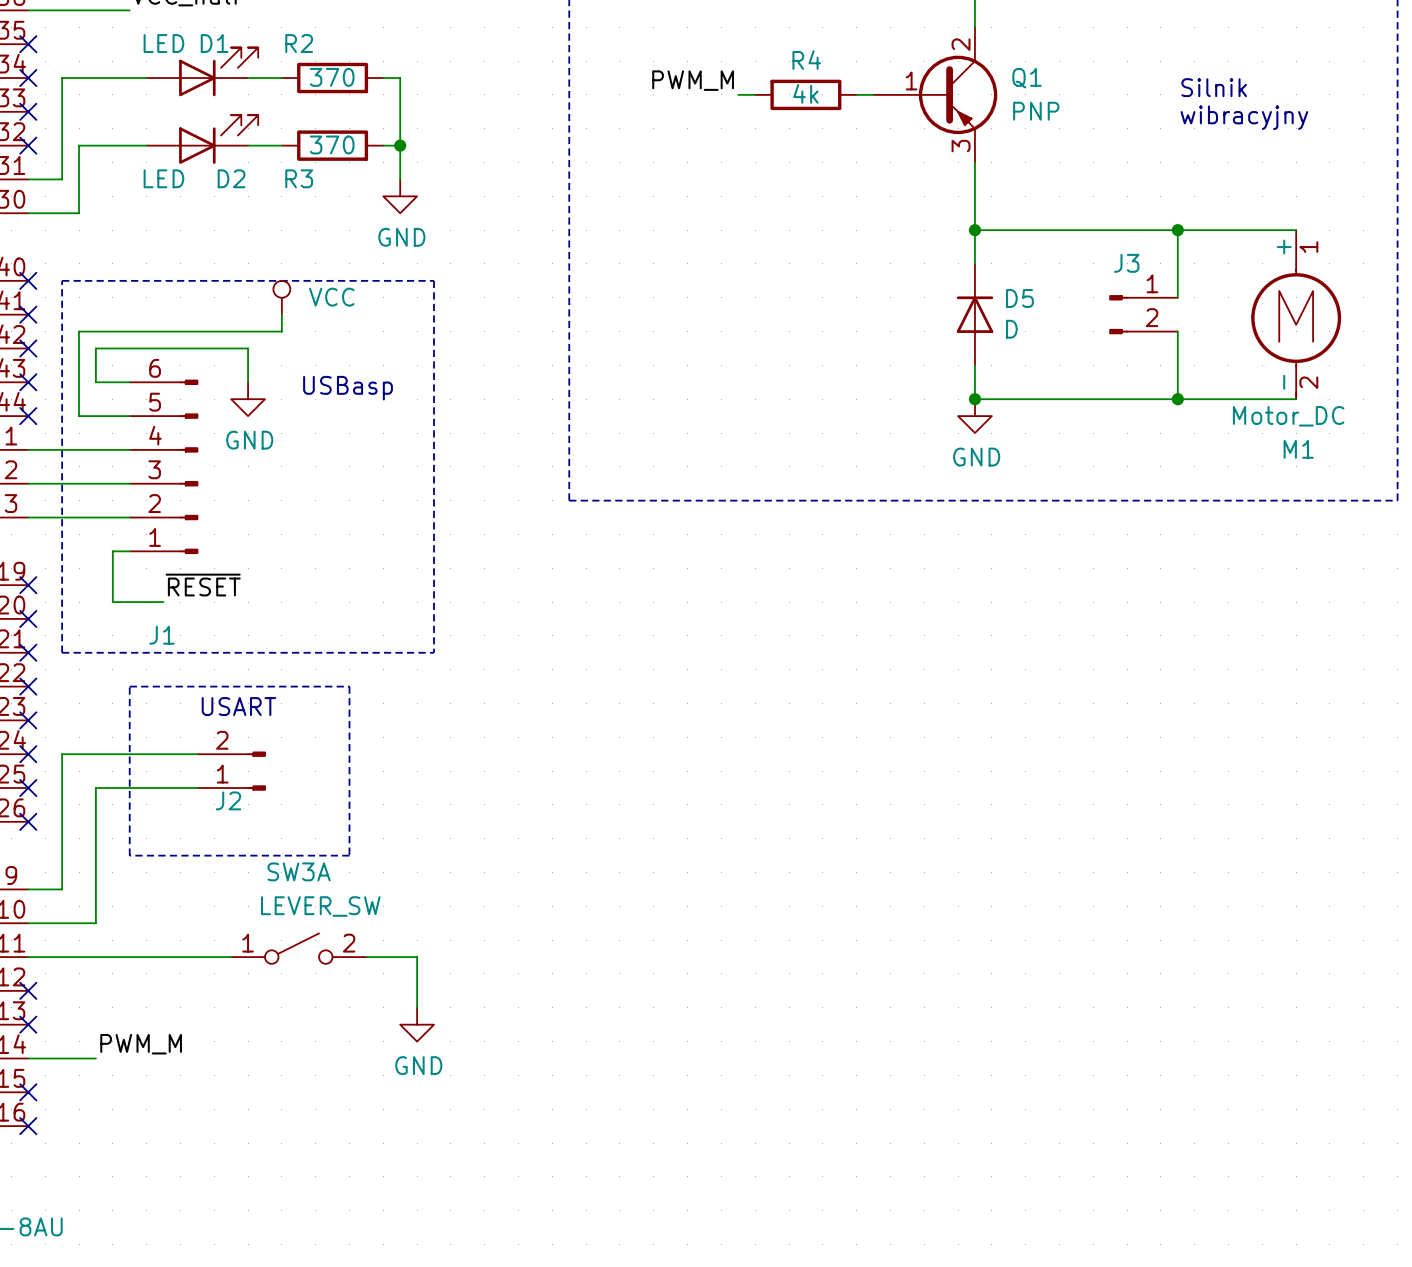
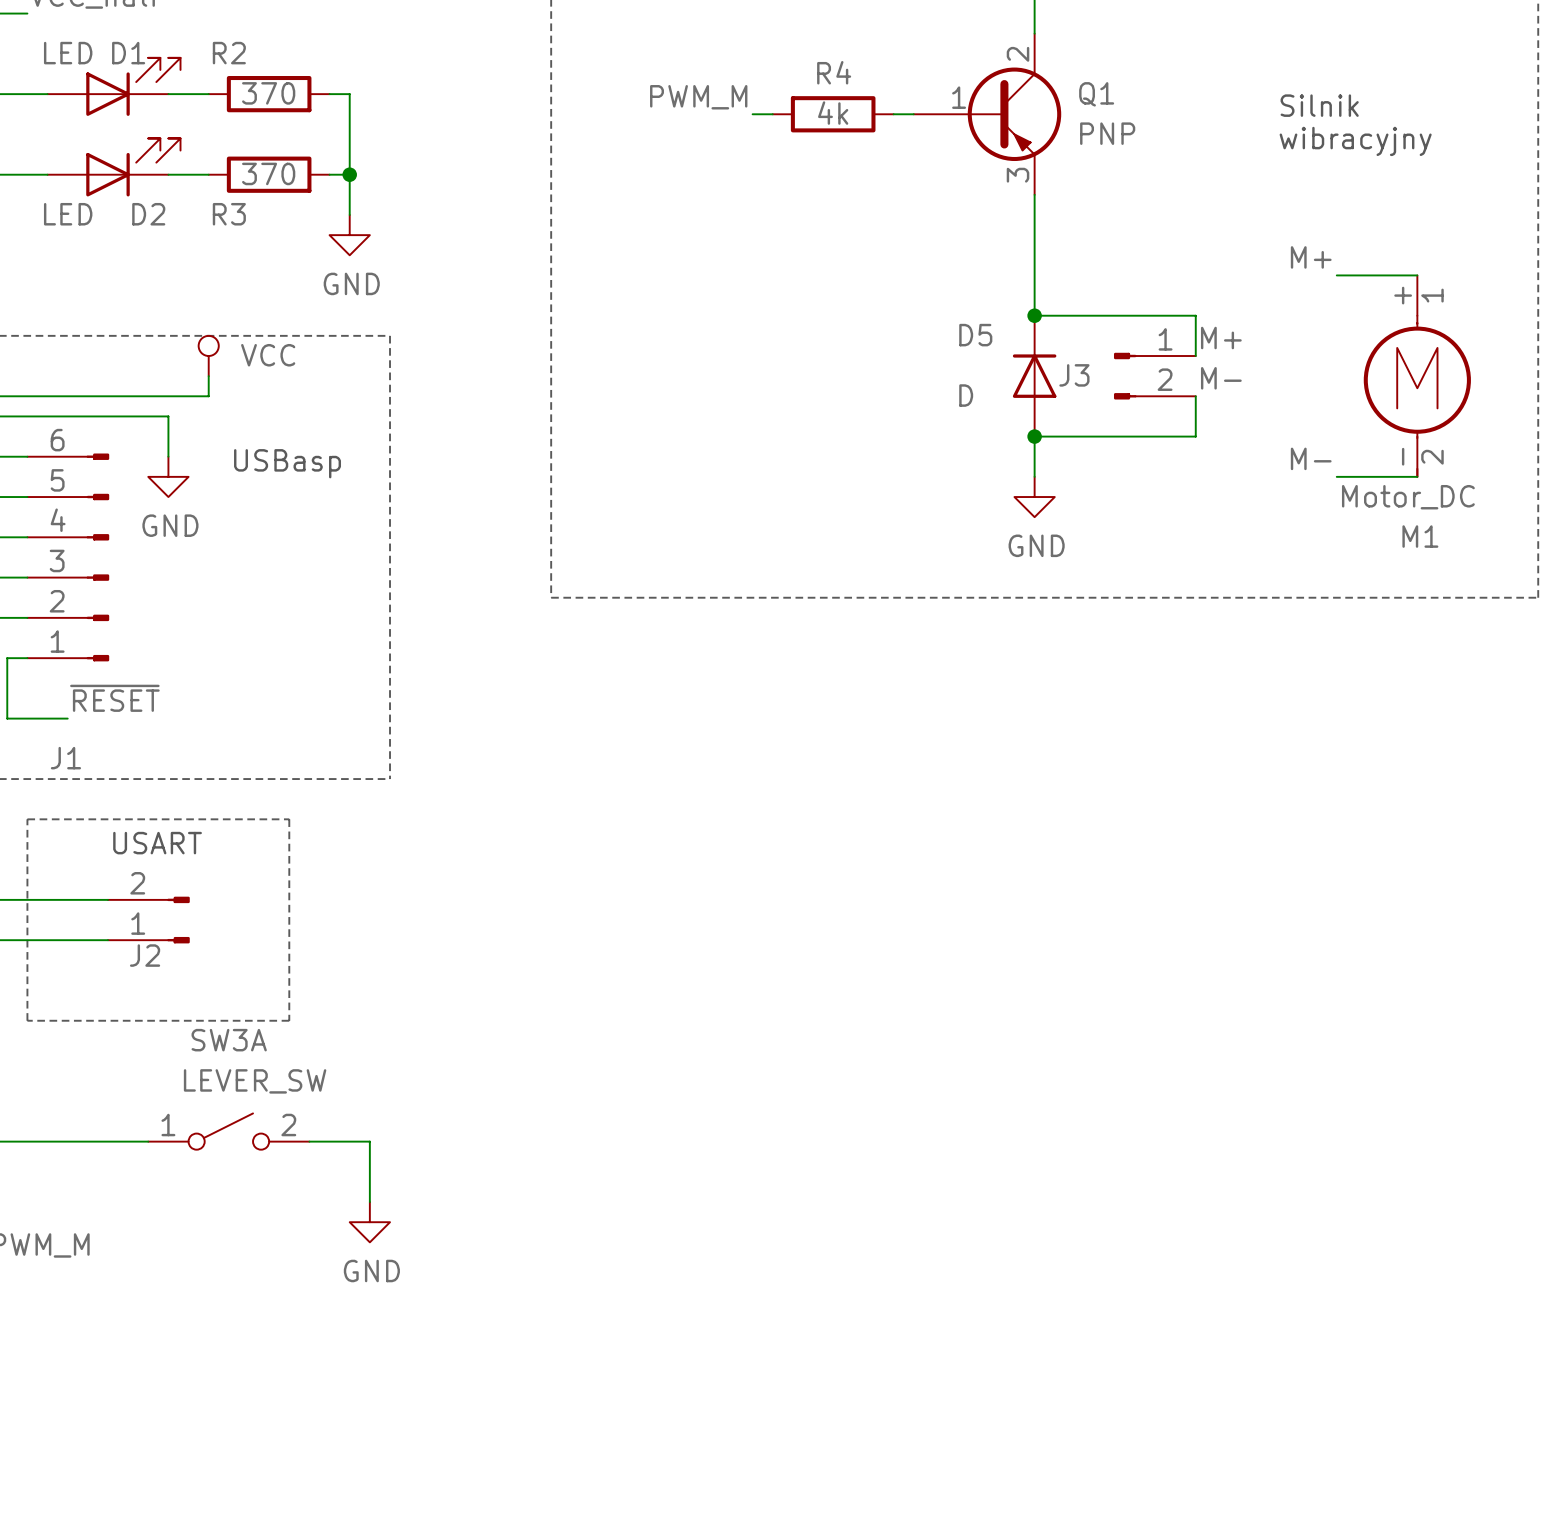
label: none -> M+ (1311, 257)
wire: (974, 230) (1228, 230) -> none
junction position: (974, 230) -> (1034, 315)
wire: (1177, 230) (1177, 297) -> none
junction: (1177, 230) -> none
wire: none -> (1034, 315) (1195, 315) (1195, 356)
J3 name position: J3 (1126, 263) -> J3 (1074, 375)
label: none -> M+ (1221, 338)
D5 name position: D5 (1019, 298) -> D5 (975, 335)
J3 position: (1143, 314) -> (1154, 376)
label: none -> M- (1221, 378)
D5 value position: D (1011, 329) -> D (966, 395)
wire: none -> (1195, 396) (1195, 436) (1034, 436)
wire: (1177, 331) (1177, 399) -> none
label: none -> M- (1311, 458)
wire: (974, 399) (1228, 399) -> none
junction position: (974, 399) -> (1034, 436)
junction: (1177, 399) -> none

